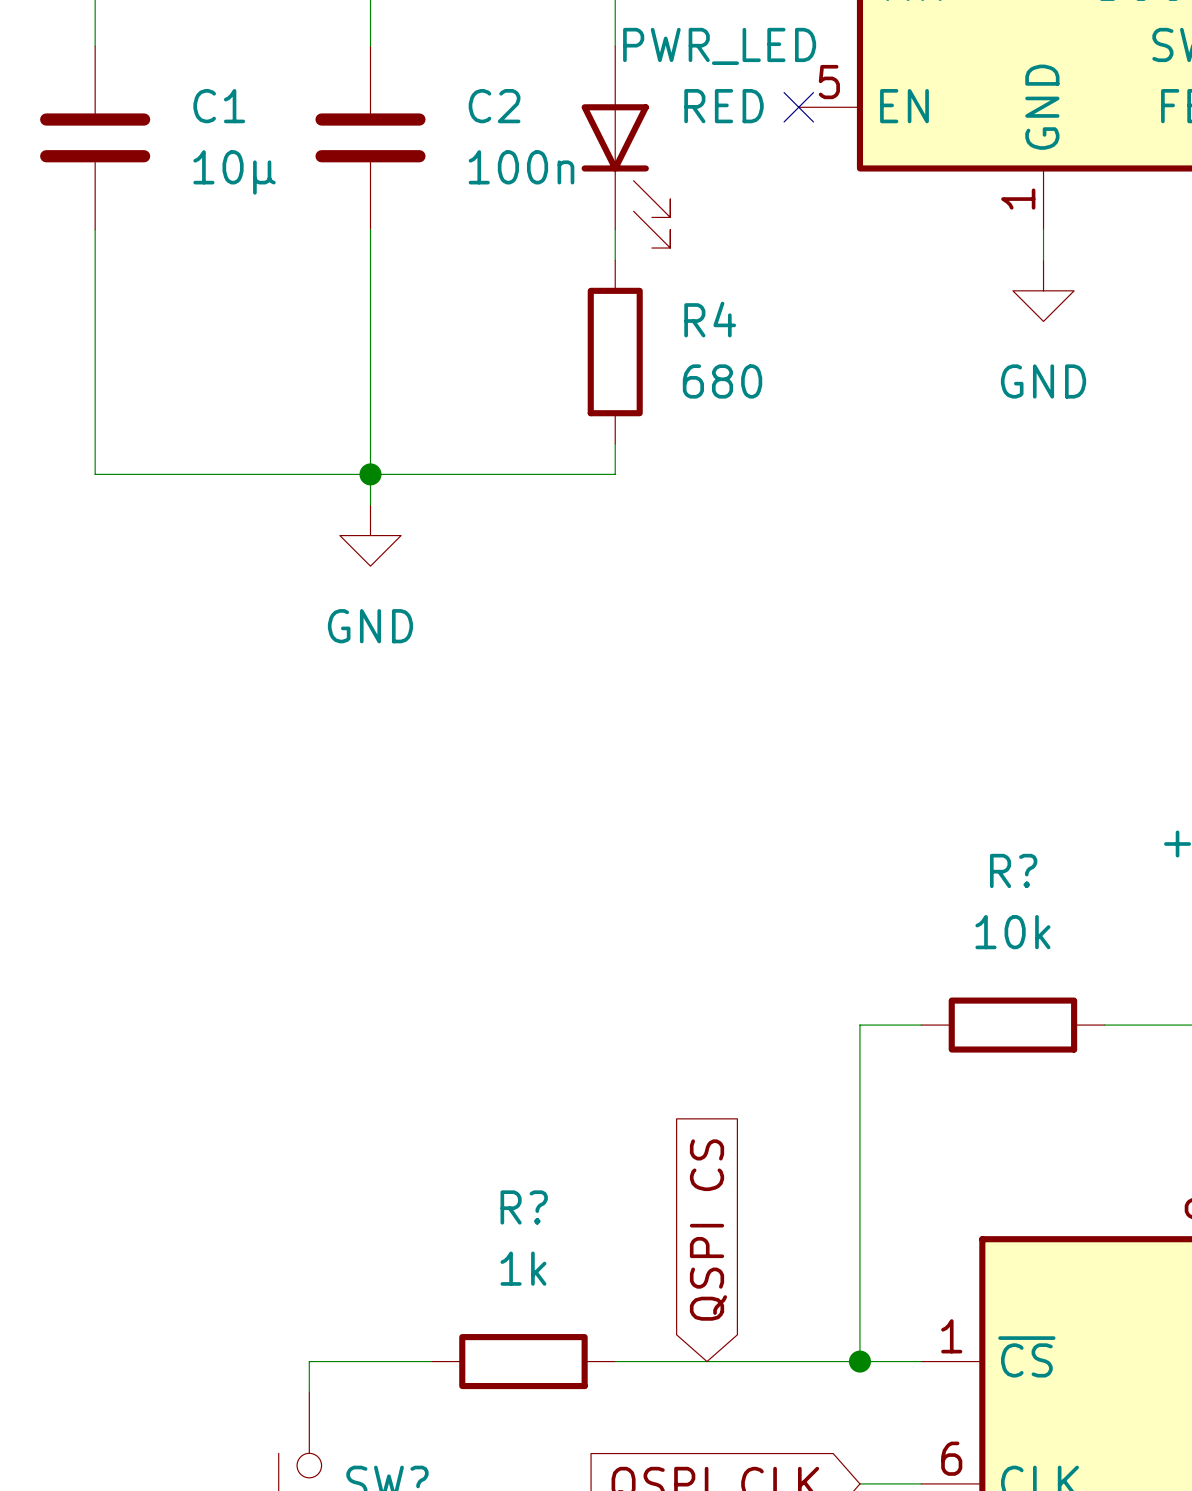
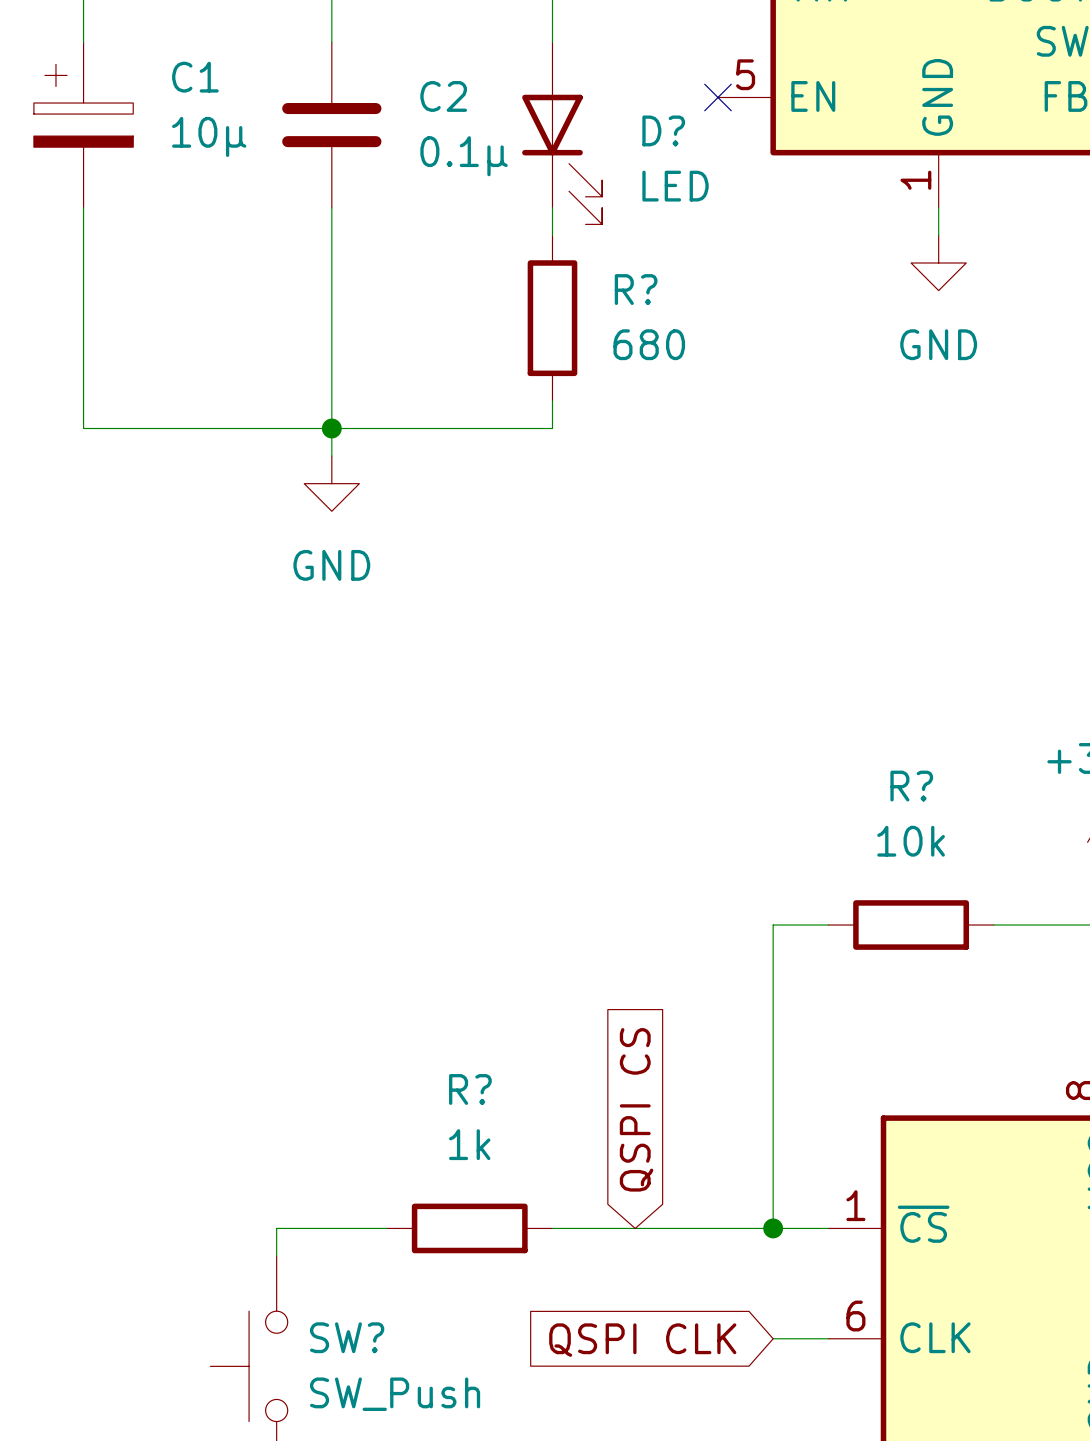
C1 symbol: [40, 46, 151, 230] -> [33, 42, 134, 208]
PWR_LED name: PWR_LED (719, 46) -> D? (663, 130)
PWR_LED value: RED (723, 106) -> LED (675, 186)
C2 value: 100n (521, 167) -> 0.1µ (464, 156)
R4 name: R4 (710, 319) -> R? (636, 289)

